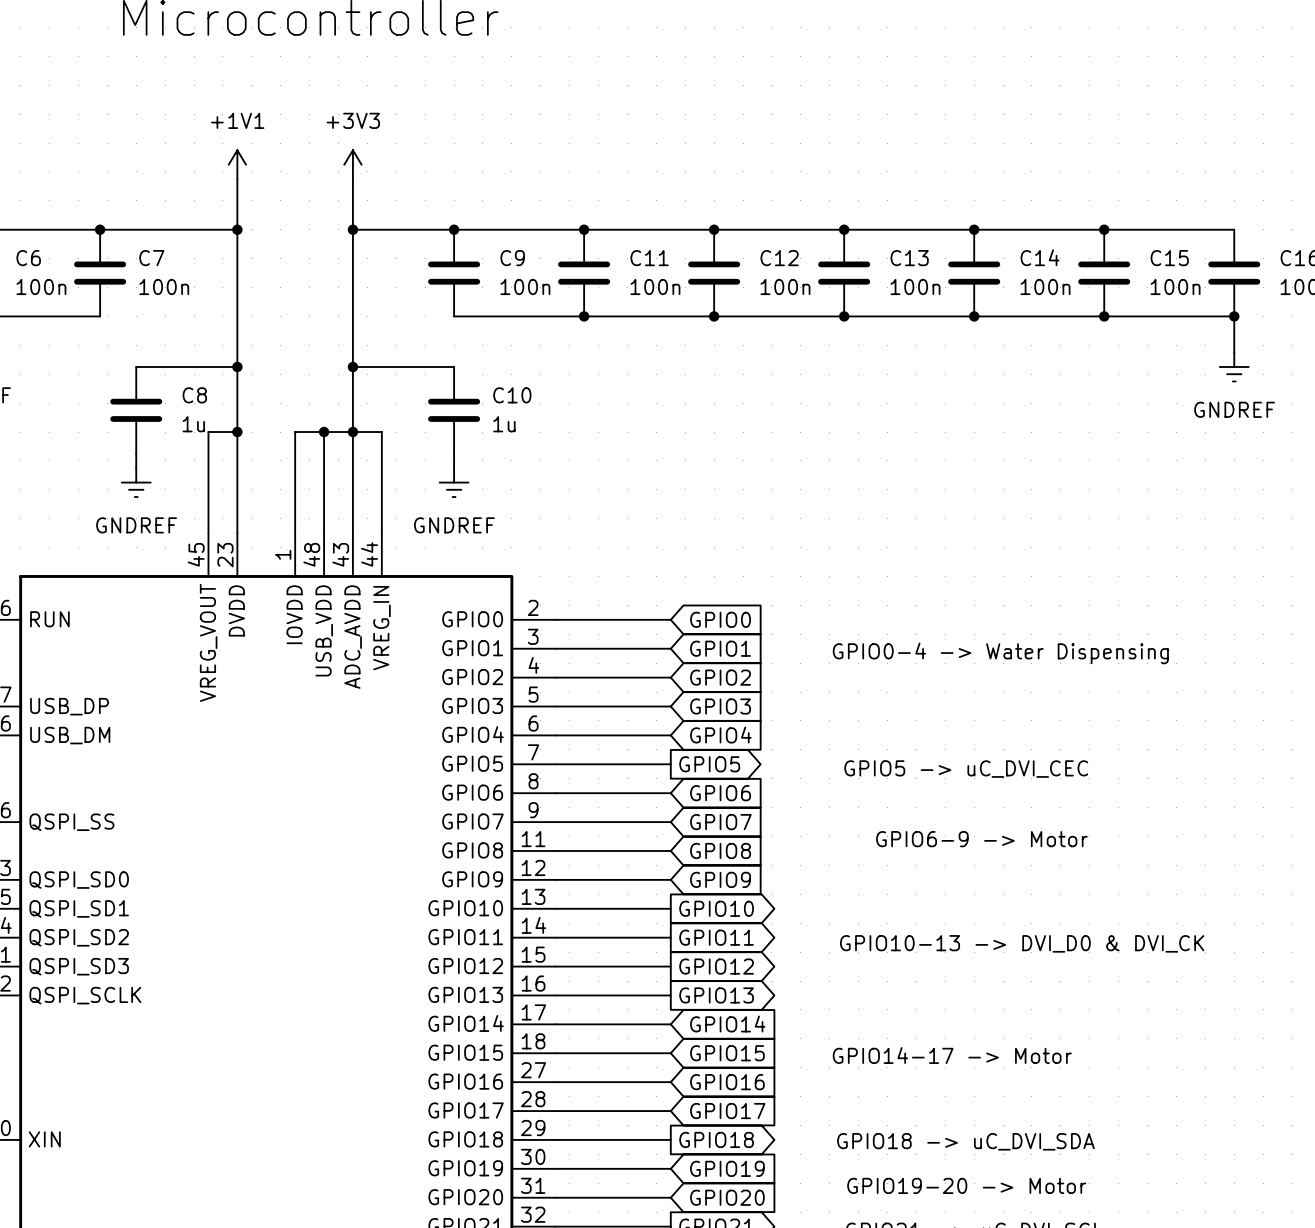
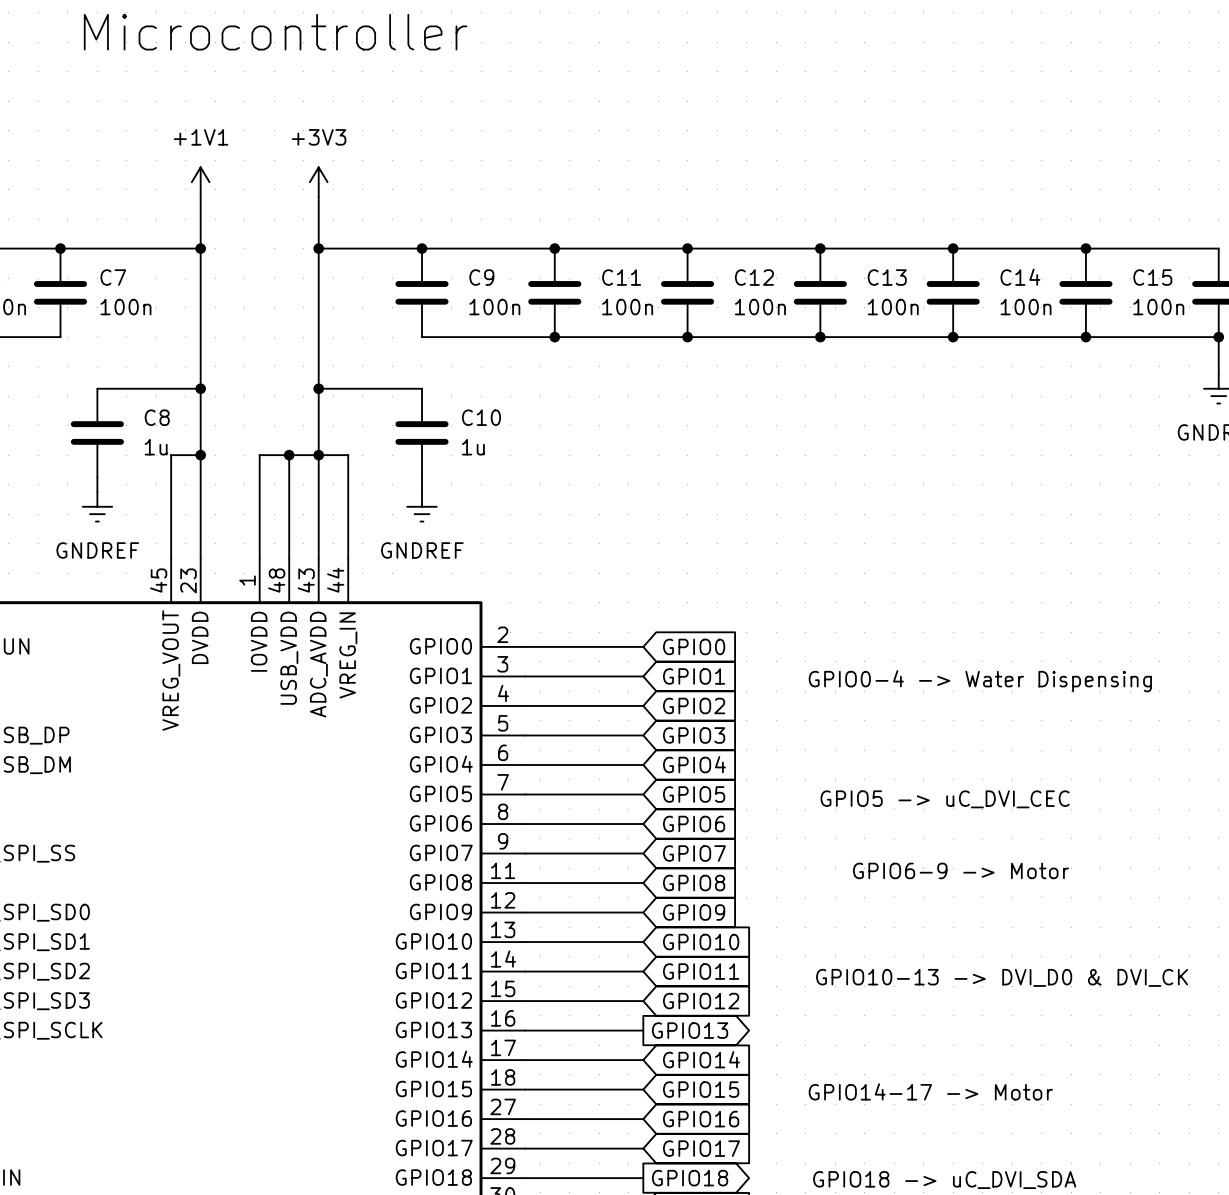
global label shape: output (709, 764) -> input (694, 794)
global label shape: output (716, 908) -> input (701, 942)
global label shape: output (716, 937) -> input (701, 971)
global label shape: output (716, 966) -> input (701, 1001)

